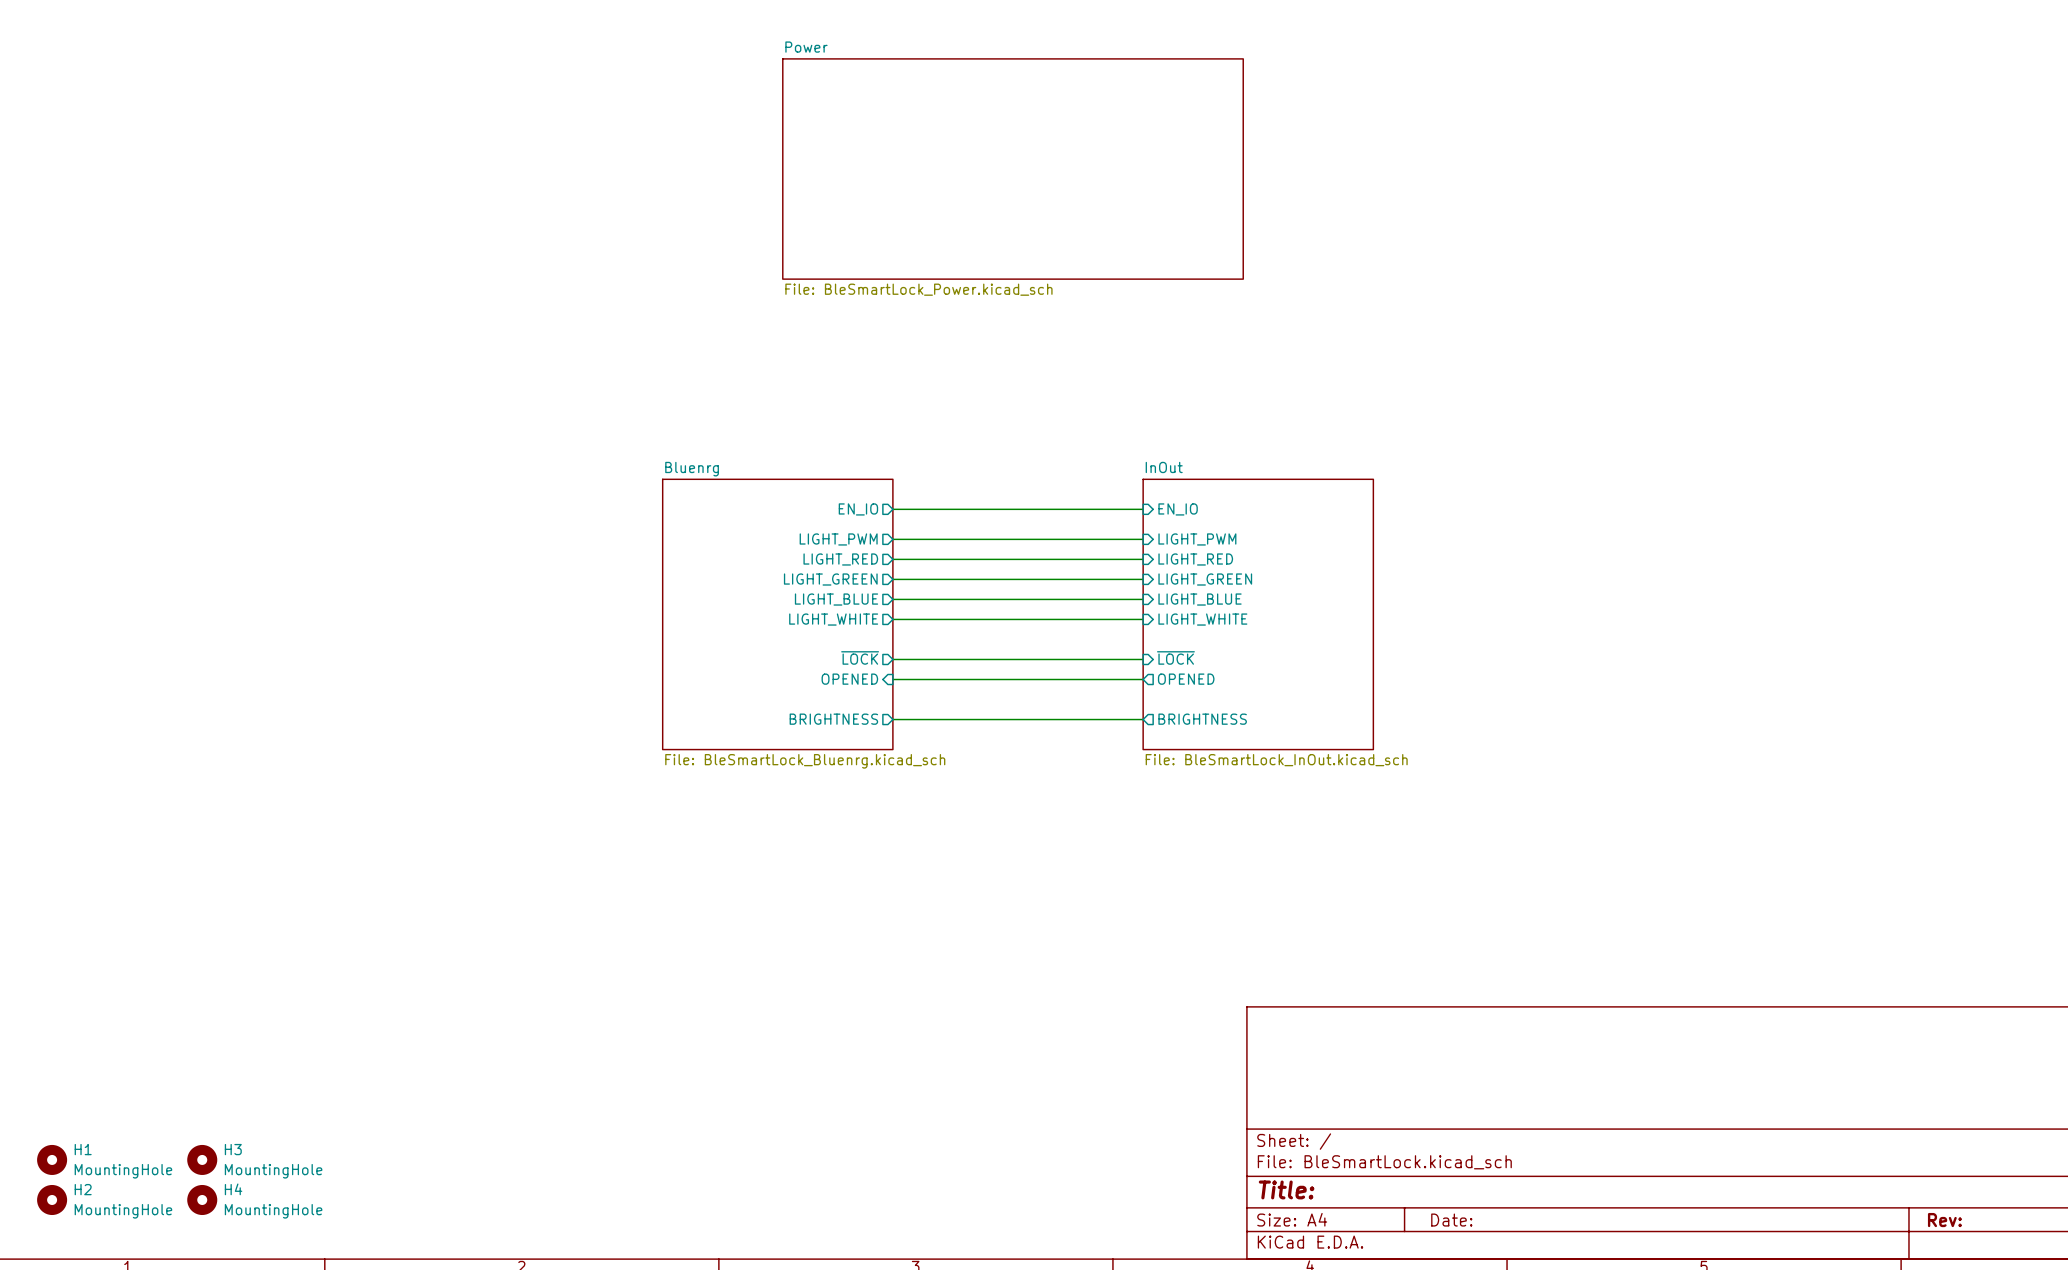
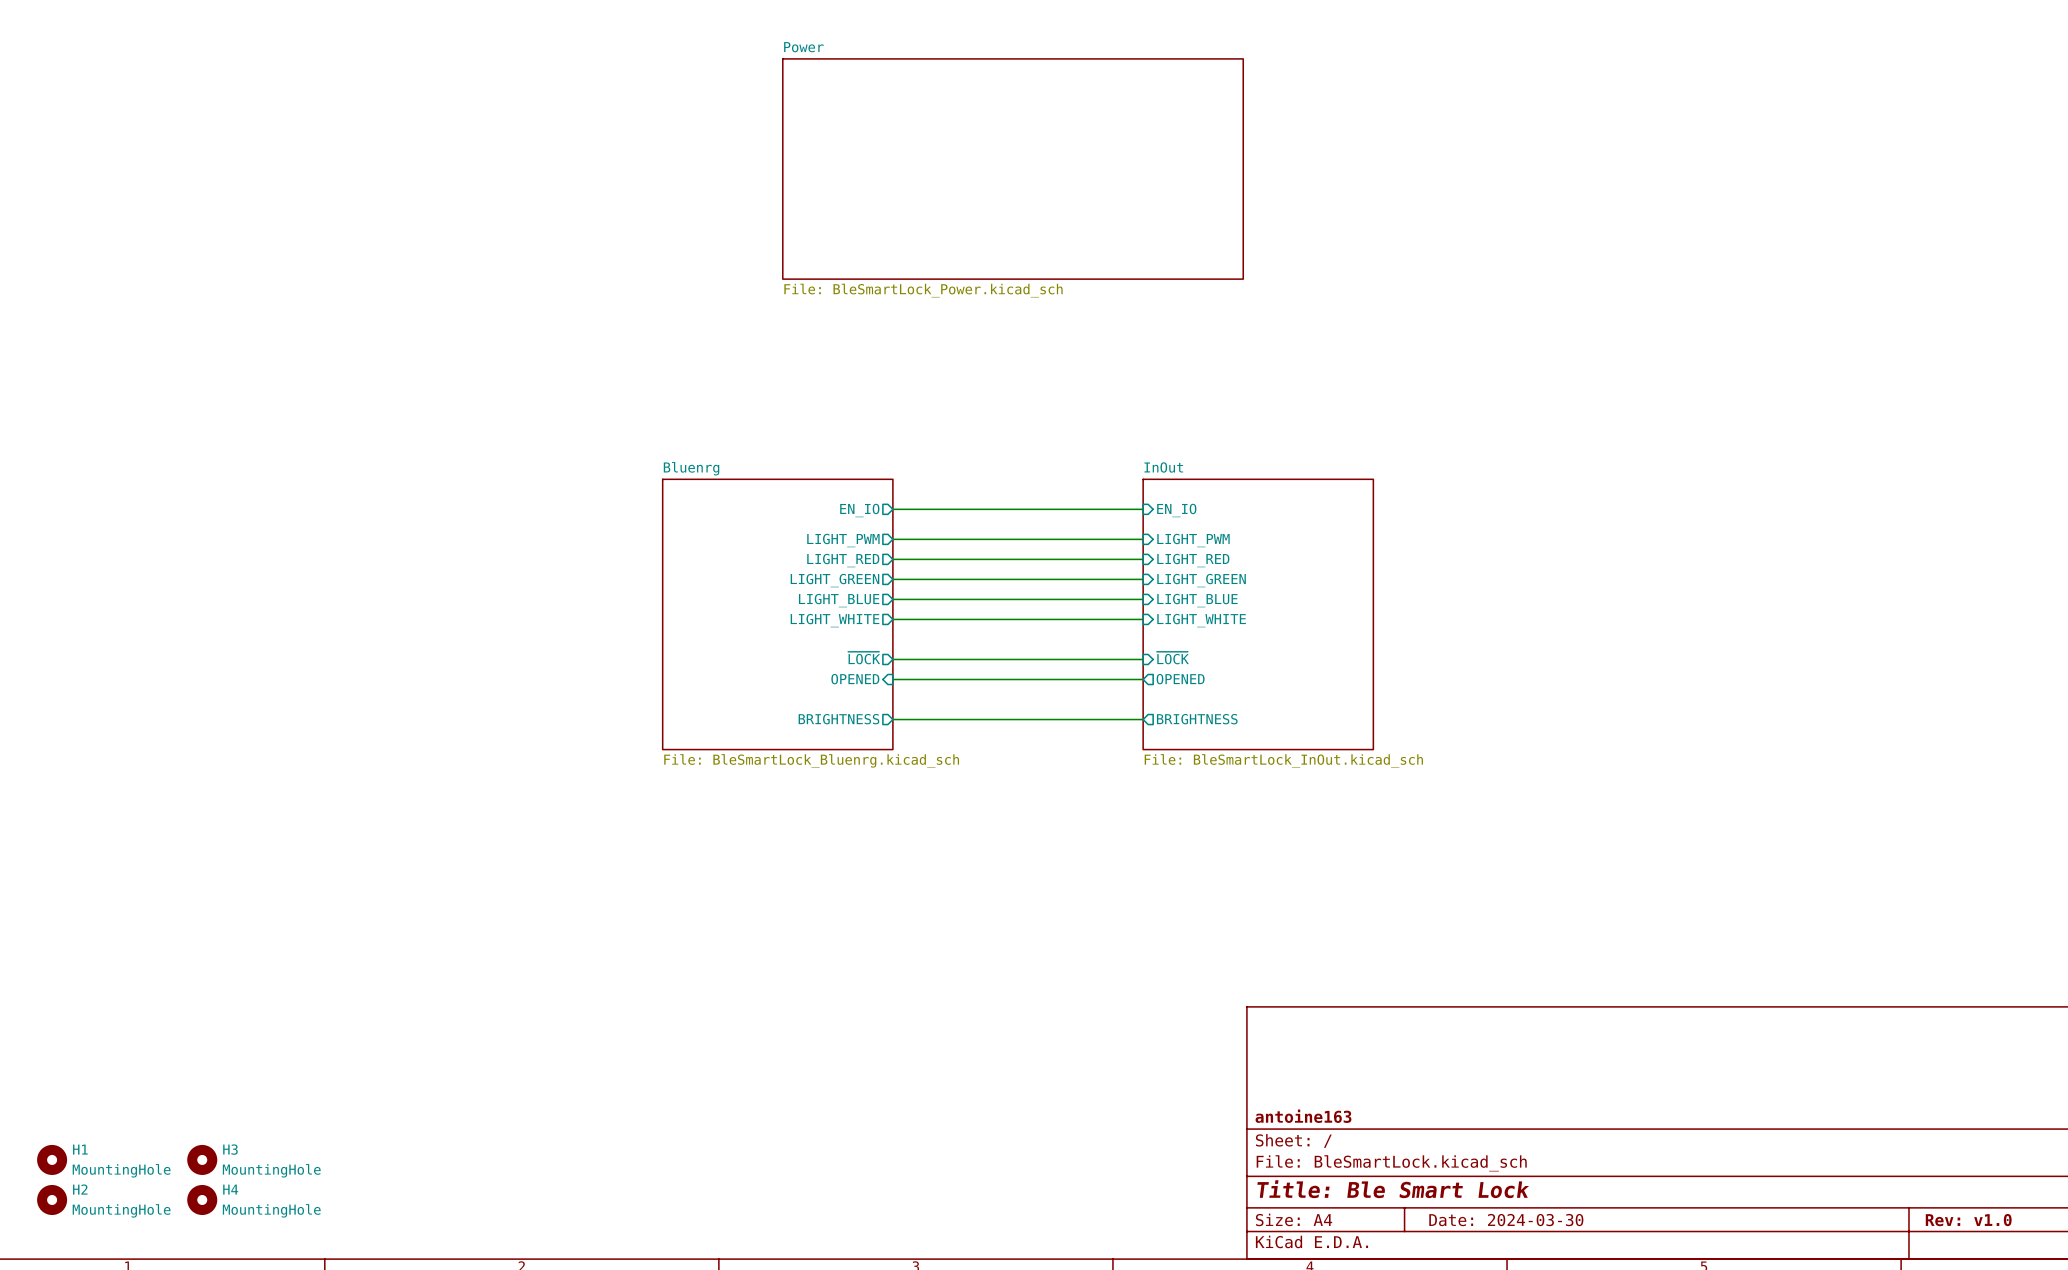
title block: none -> antoine163 (1303, 1116)
title block: Title: (1286, 1189) -> Title: Ble Smart Lock (1393, 1189)
title block: Date: (1451, 1220) -> Date: 2024-03-30 (1506, 1220)
title block: Rev: (1944, 1220) -> Rev: v1.0 (1968, 1220)

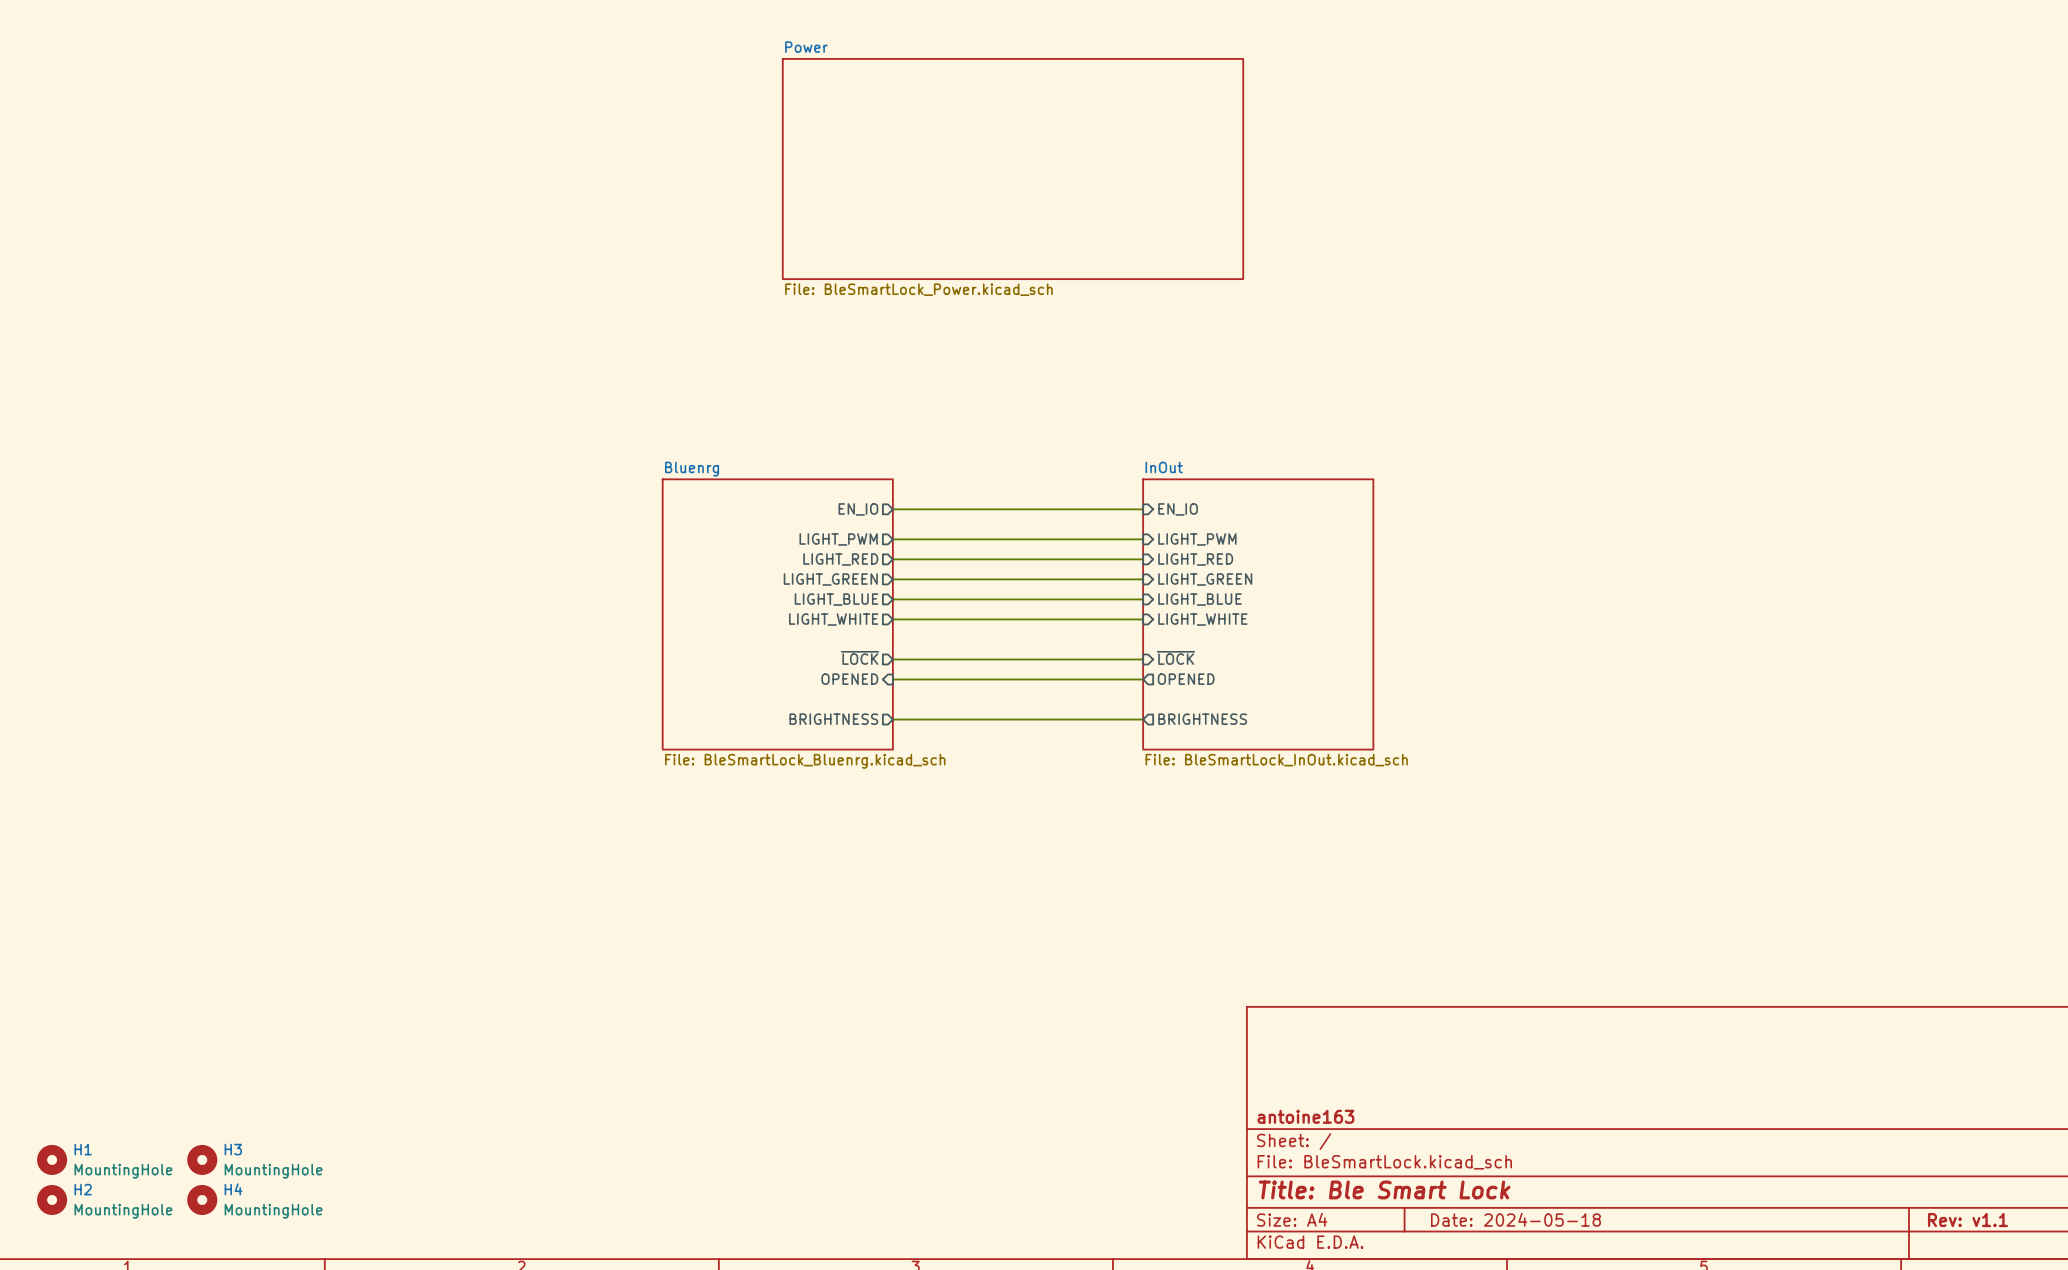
title block: Date: 2024-03-30 (1506, 1220) -> Date: 2024-05-18 (1515, 1219)
title block: Rev: v1.0 (1968, 1220) -> Rev: v1.1 (1967, 1220)

